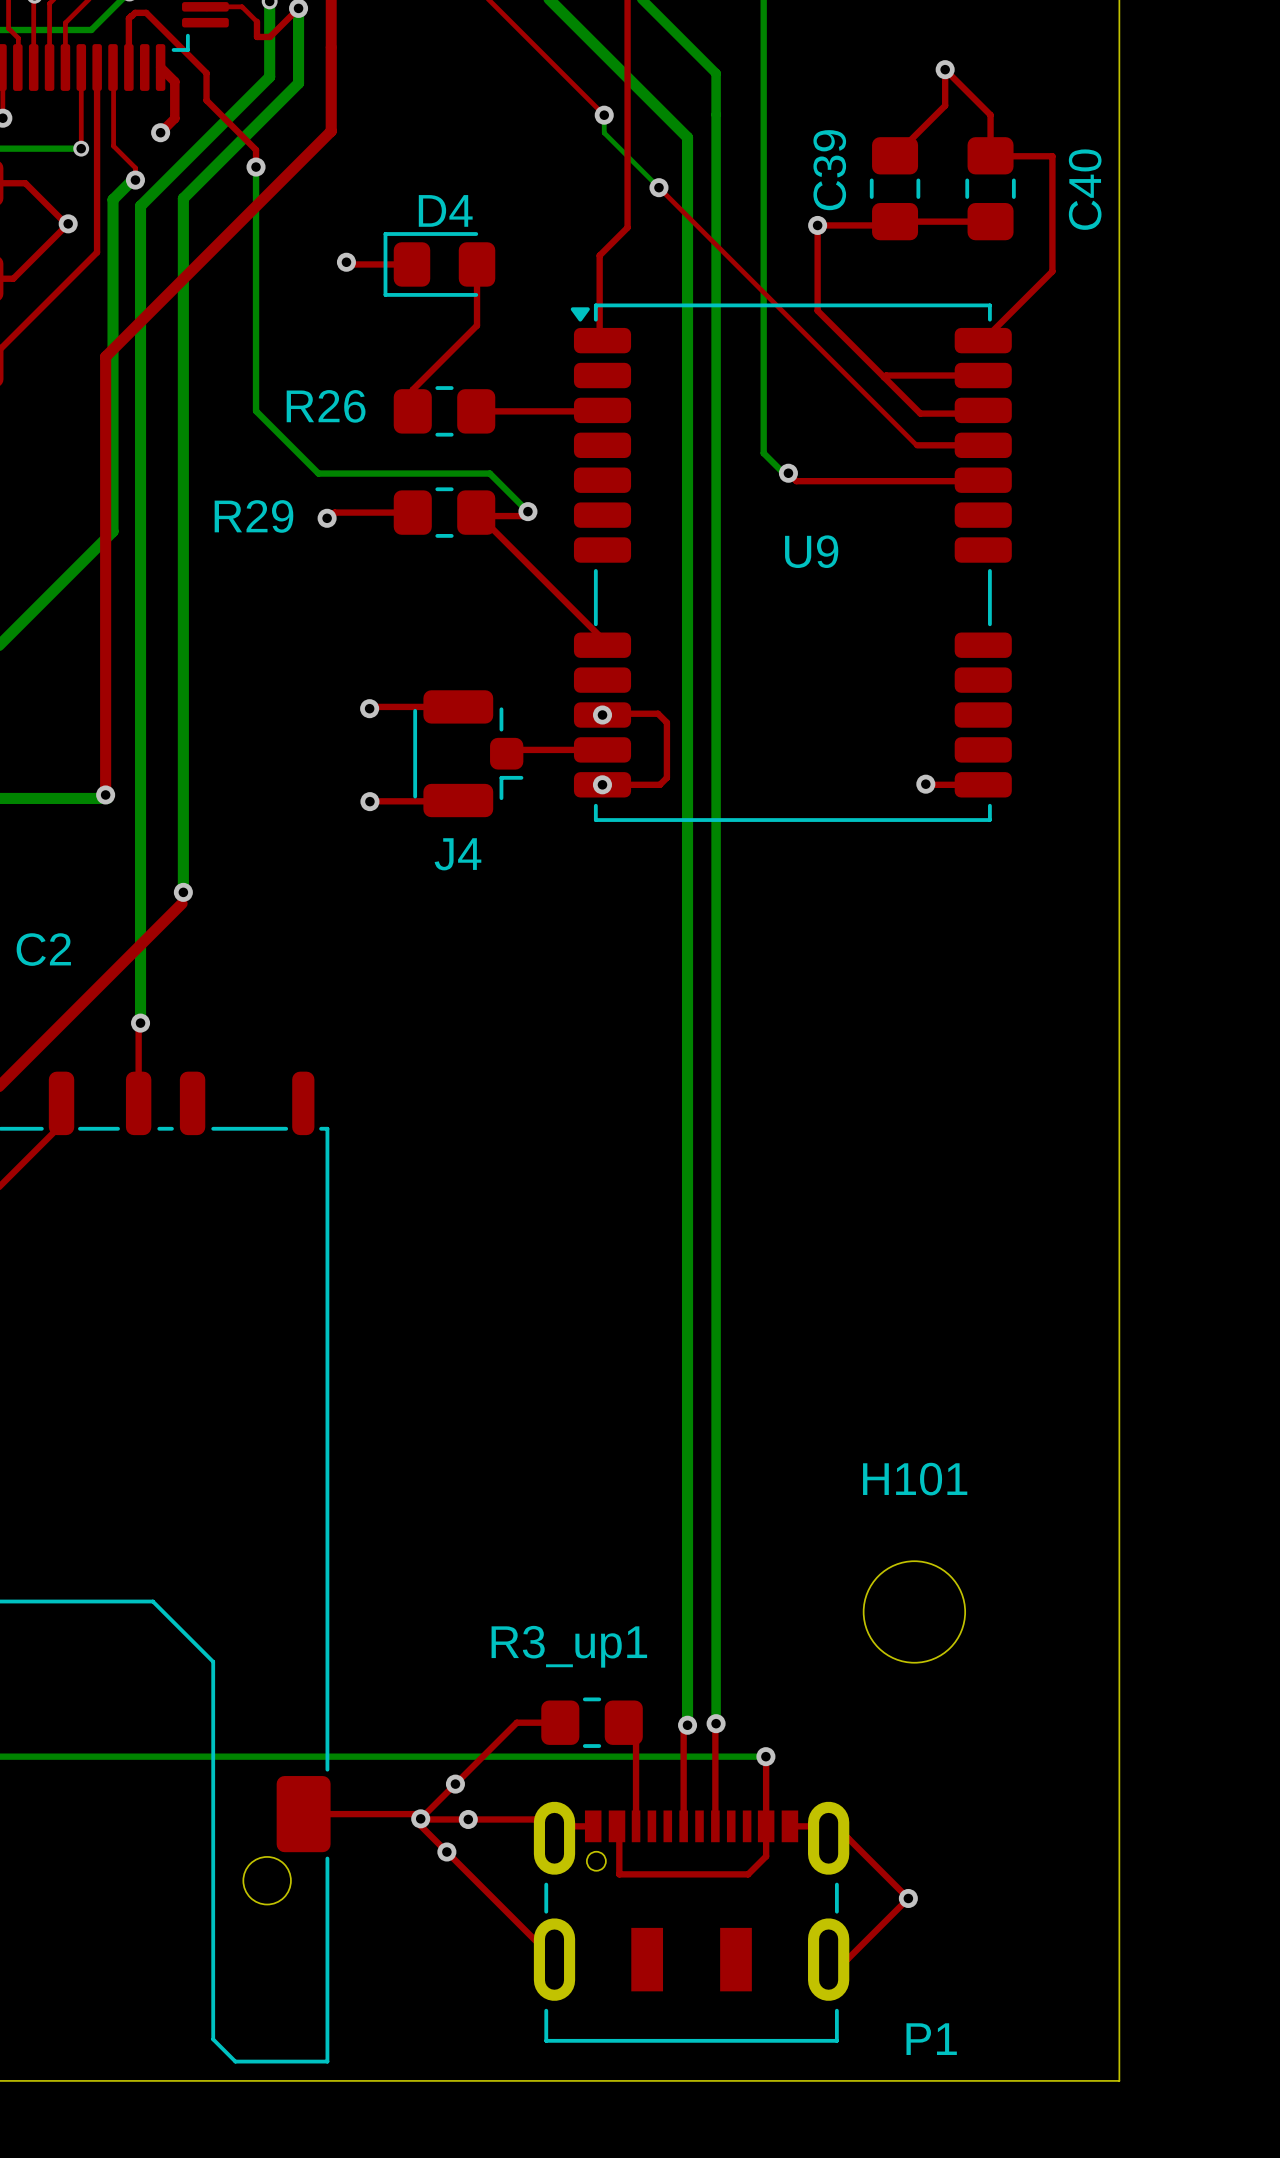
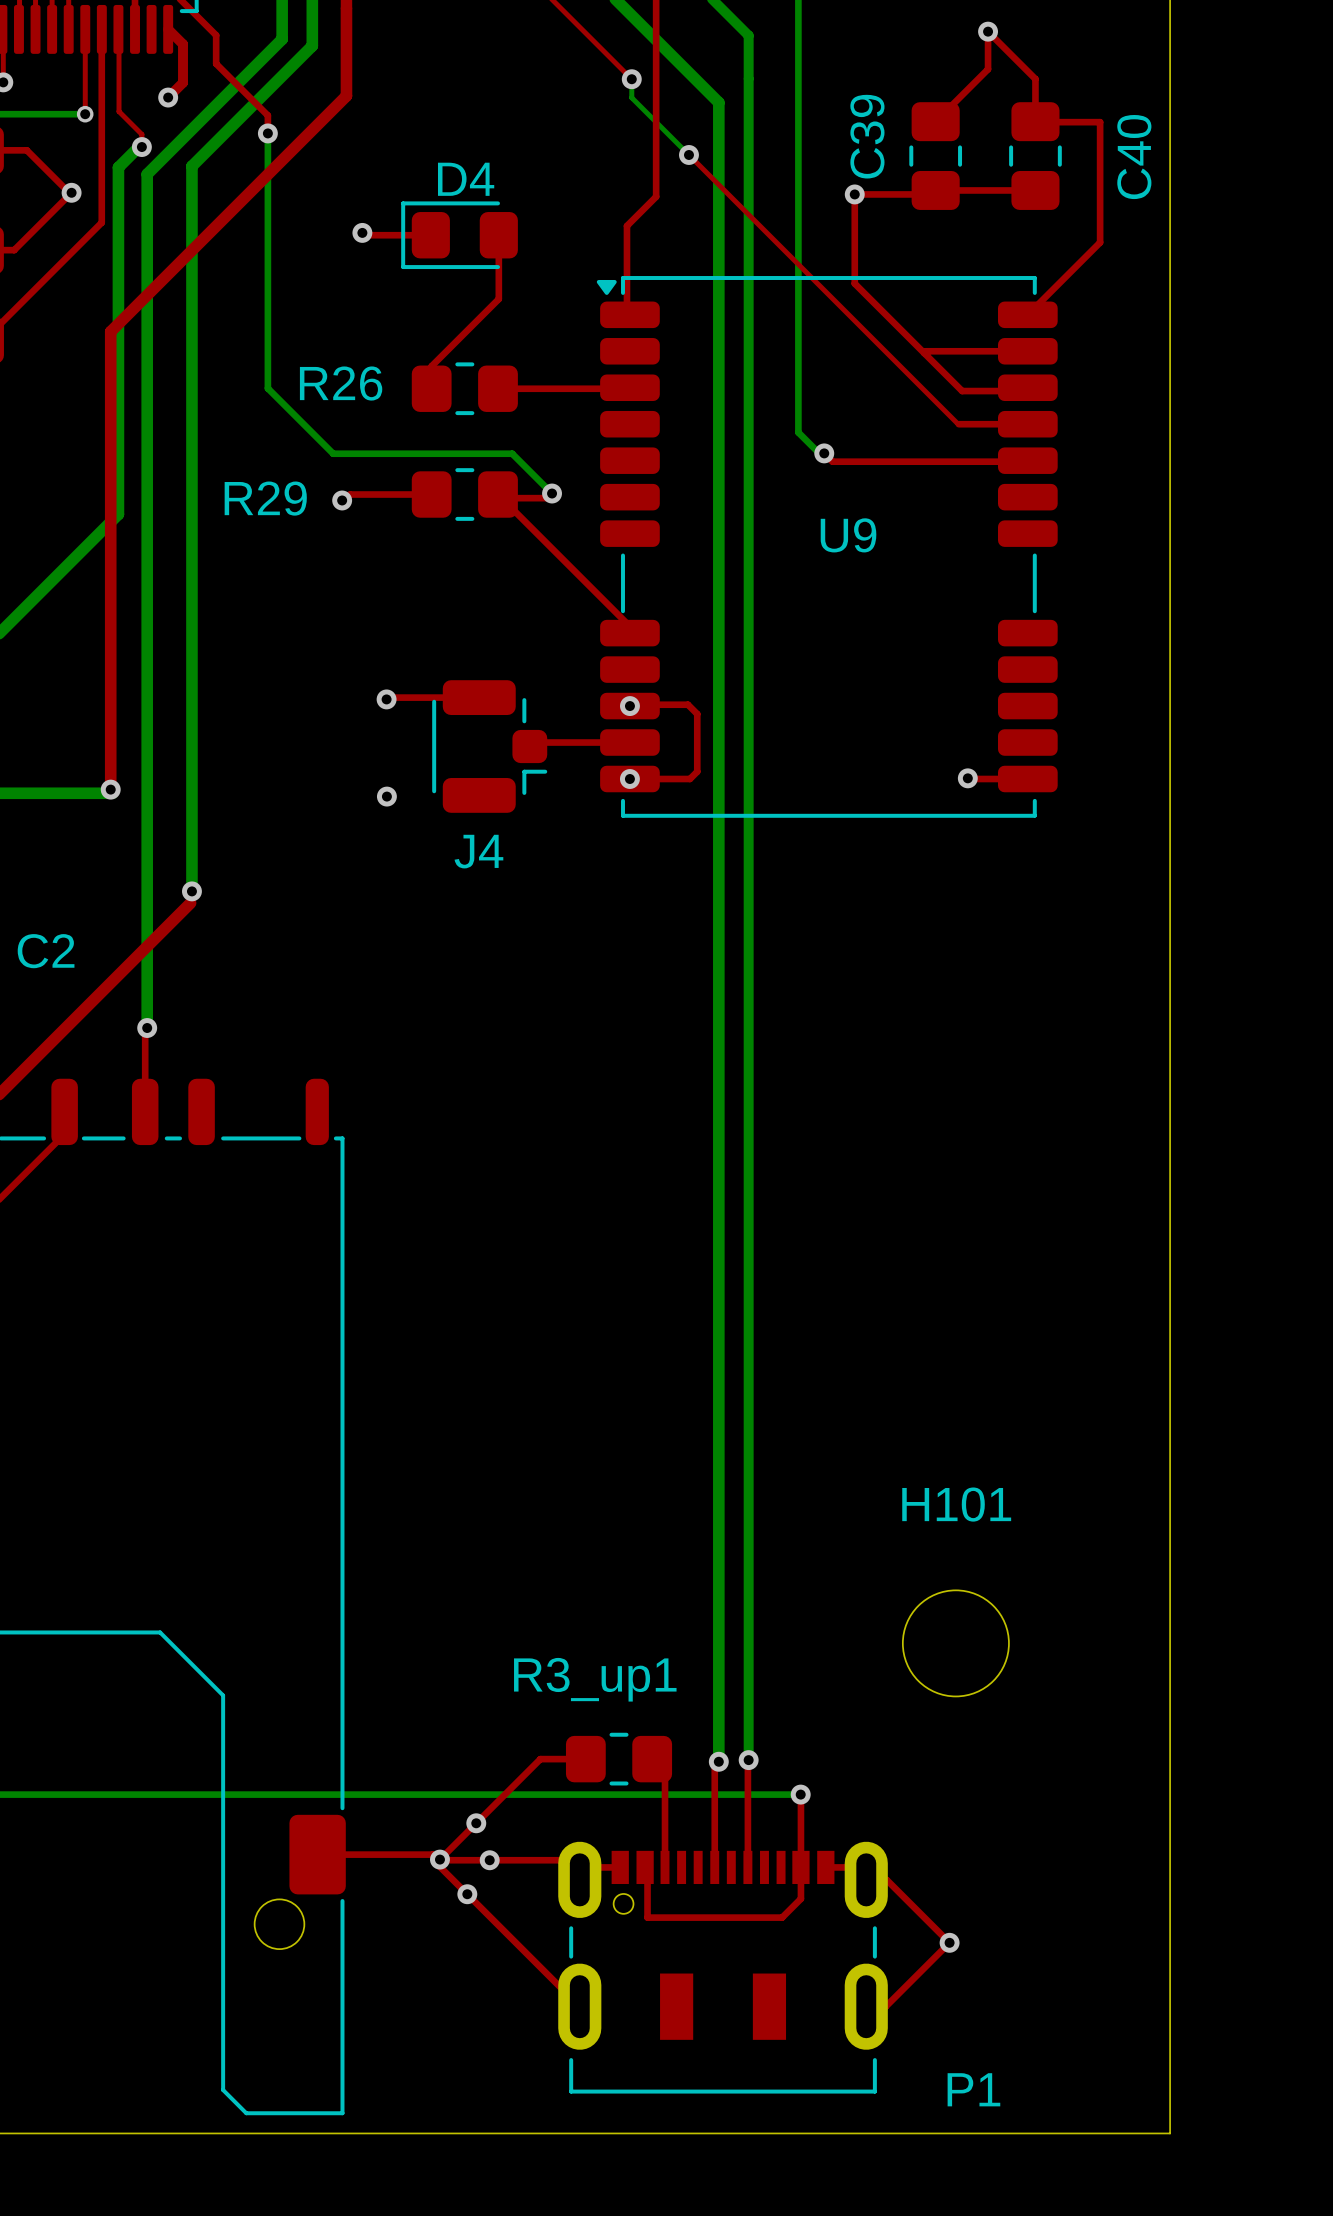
top track: (371, 801) (457, 801) -> none

